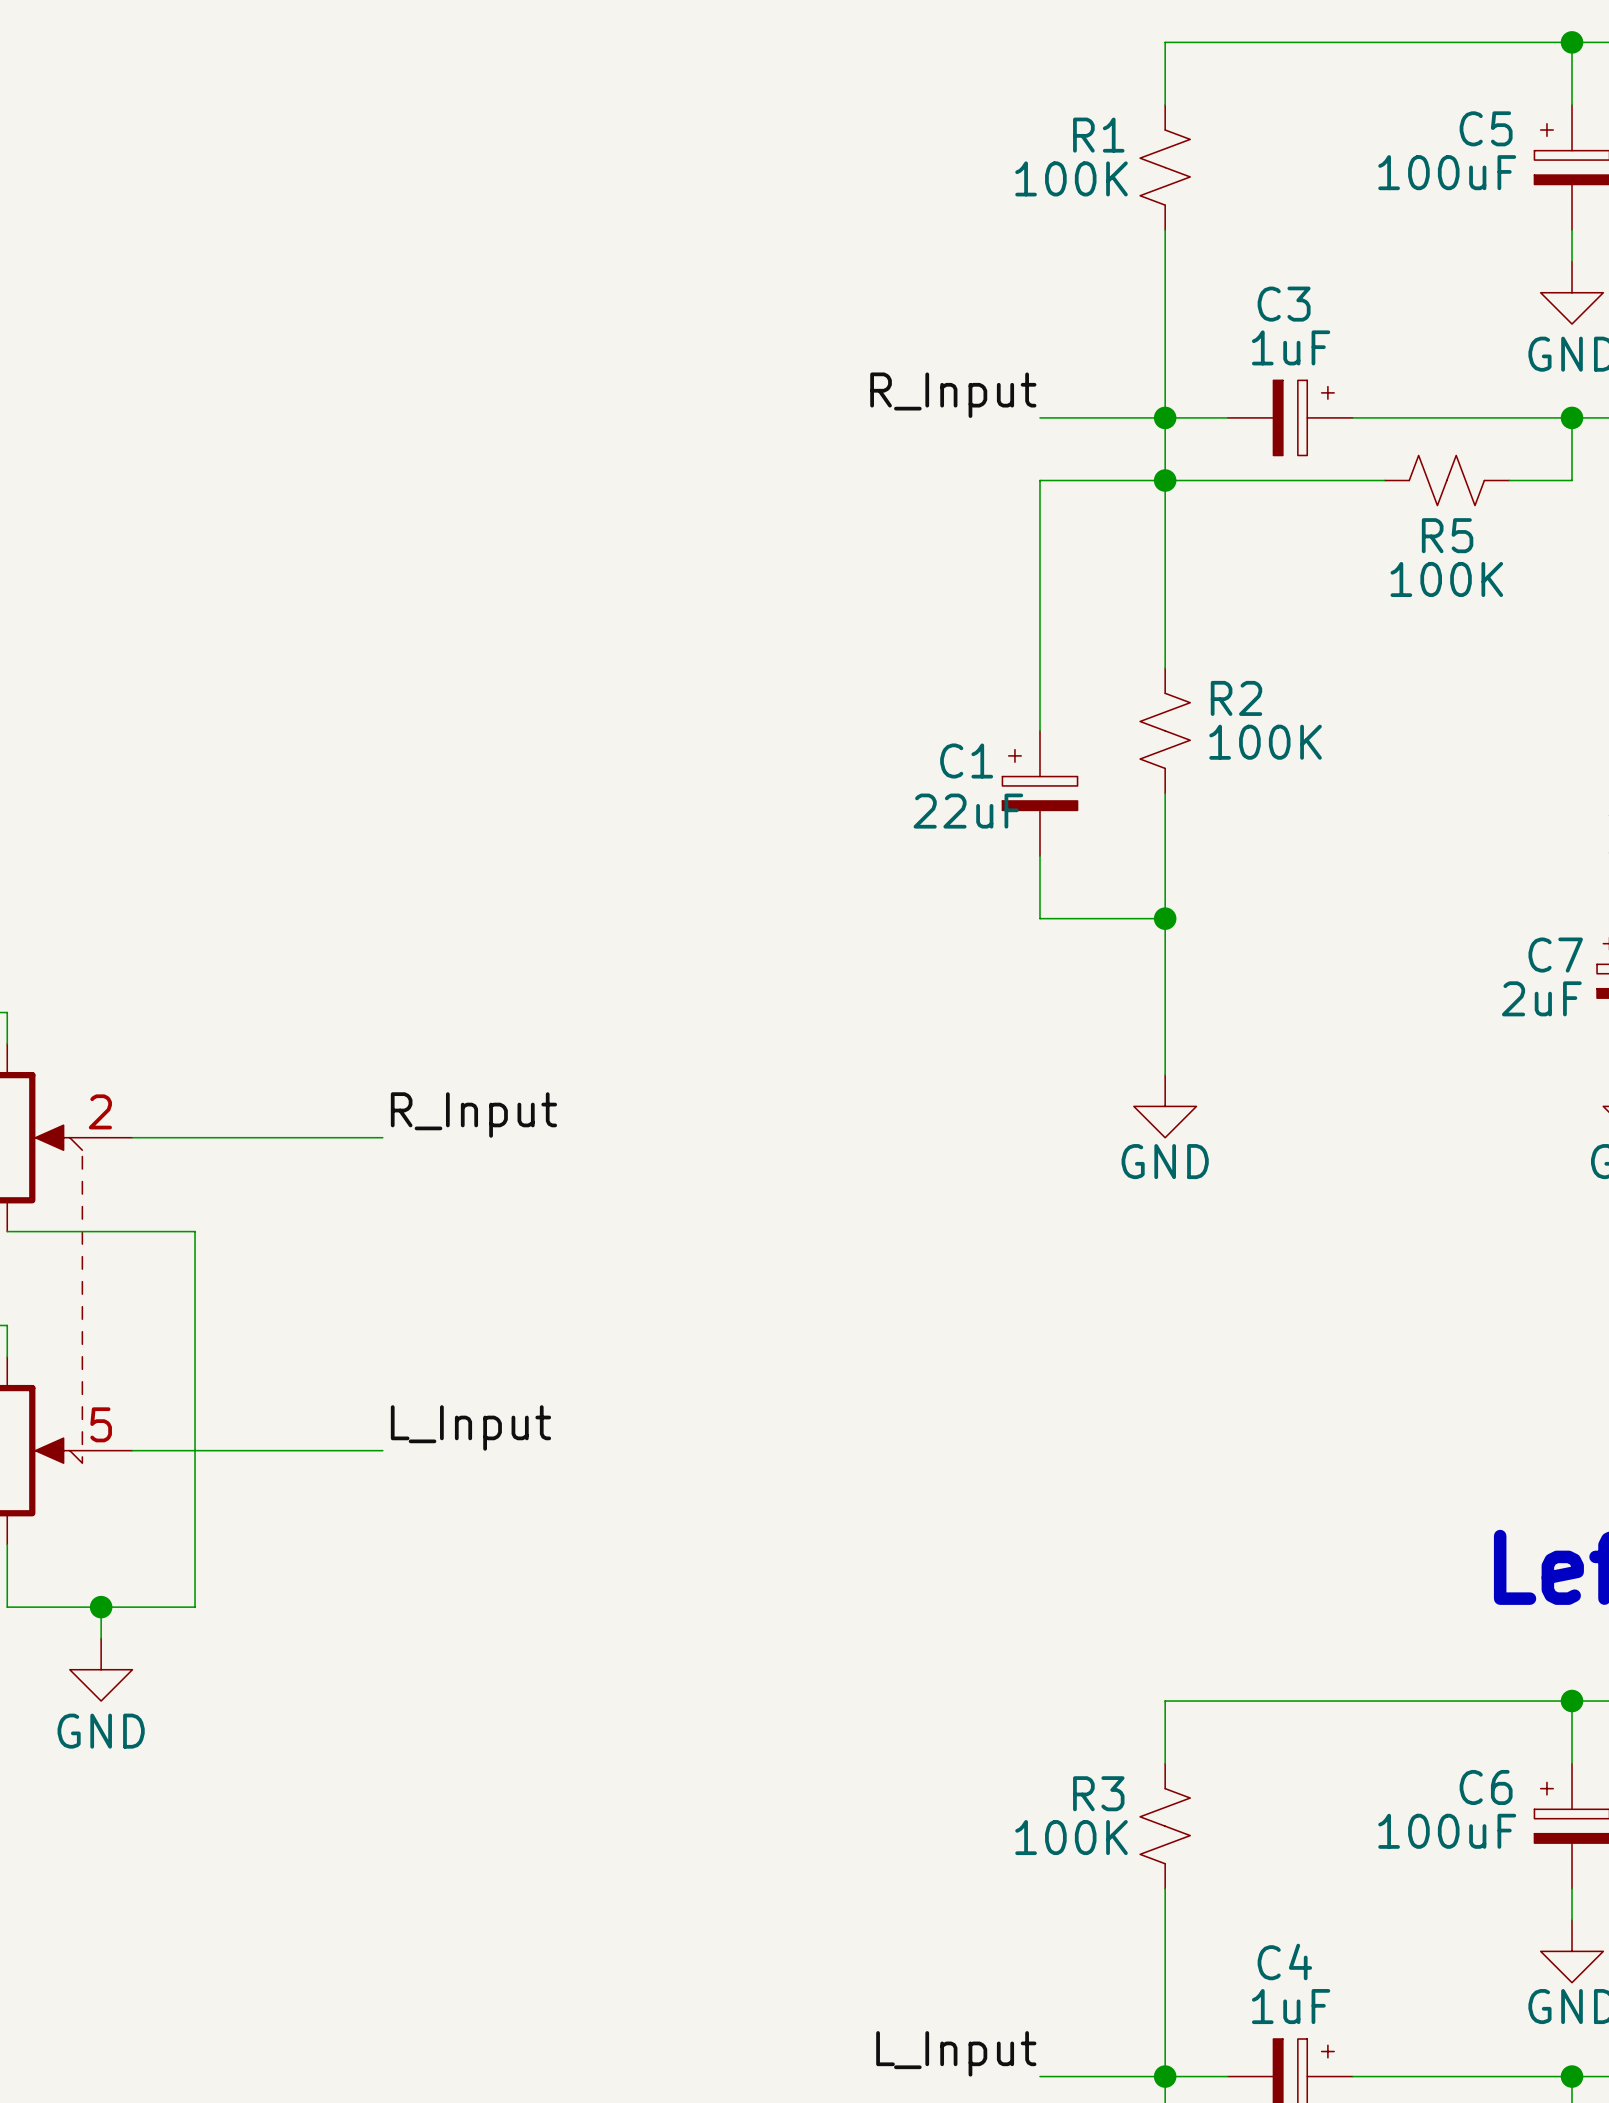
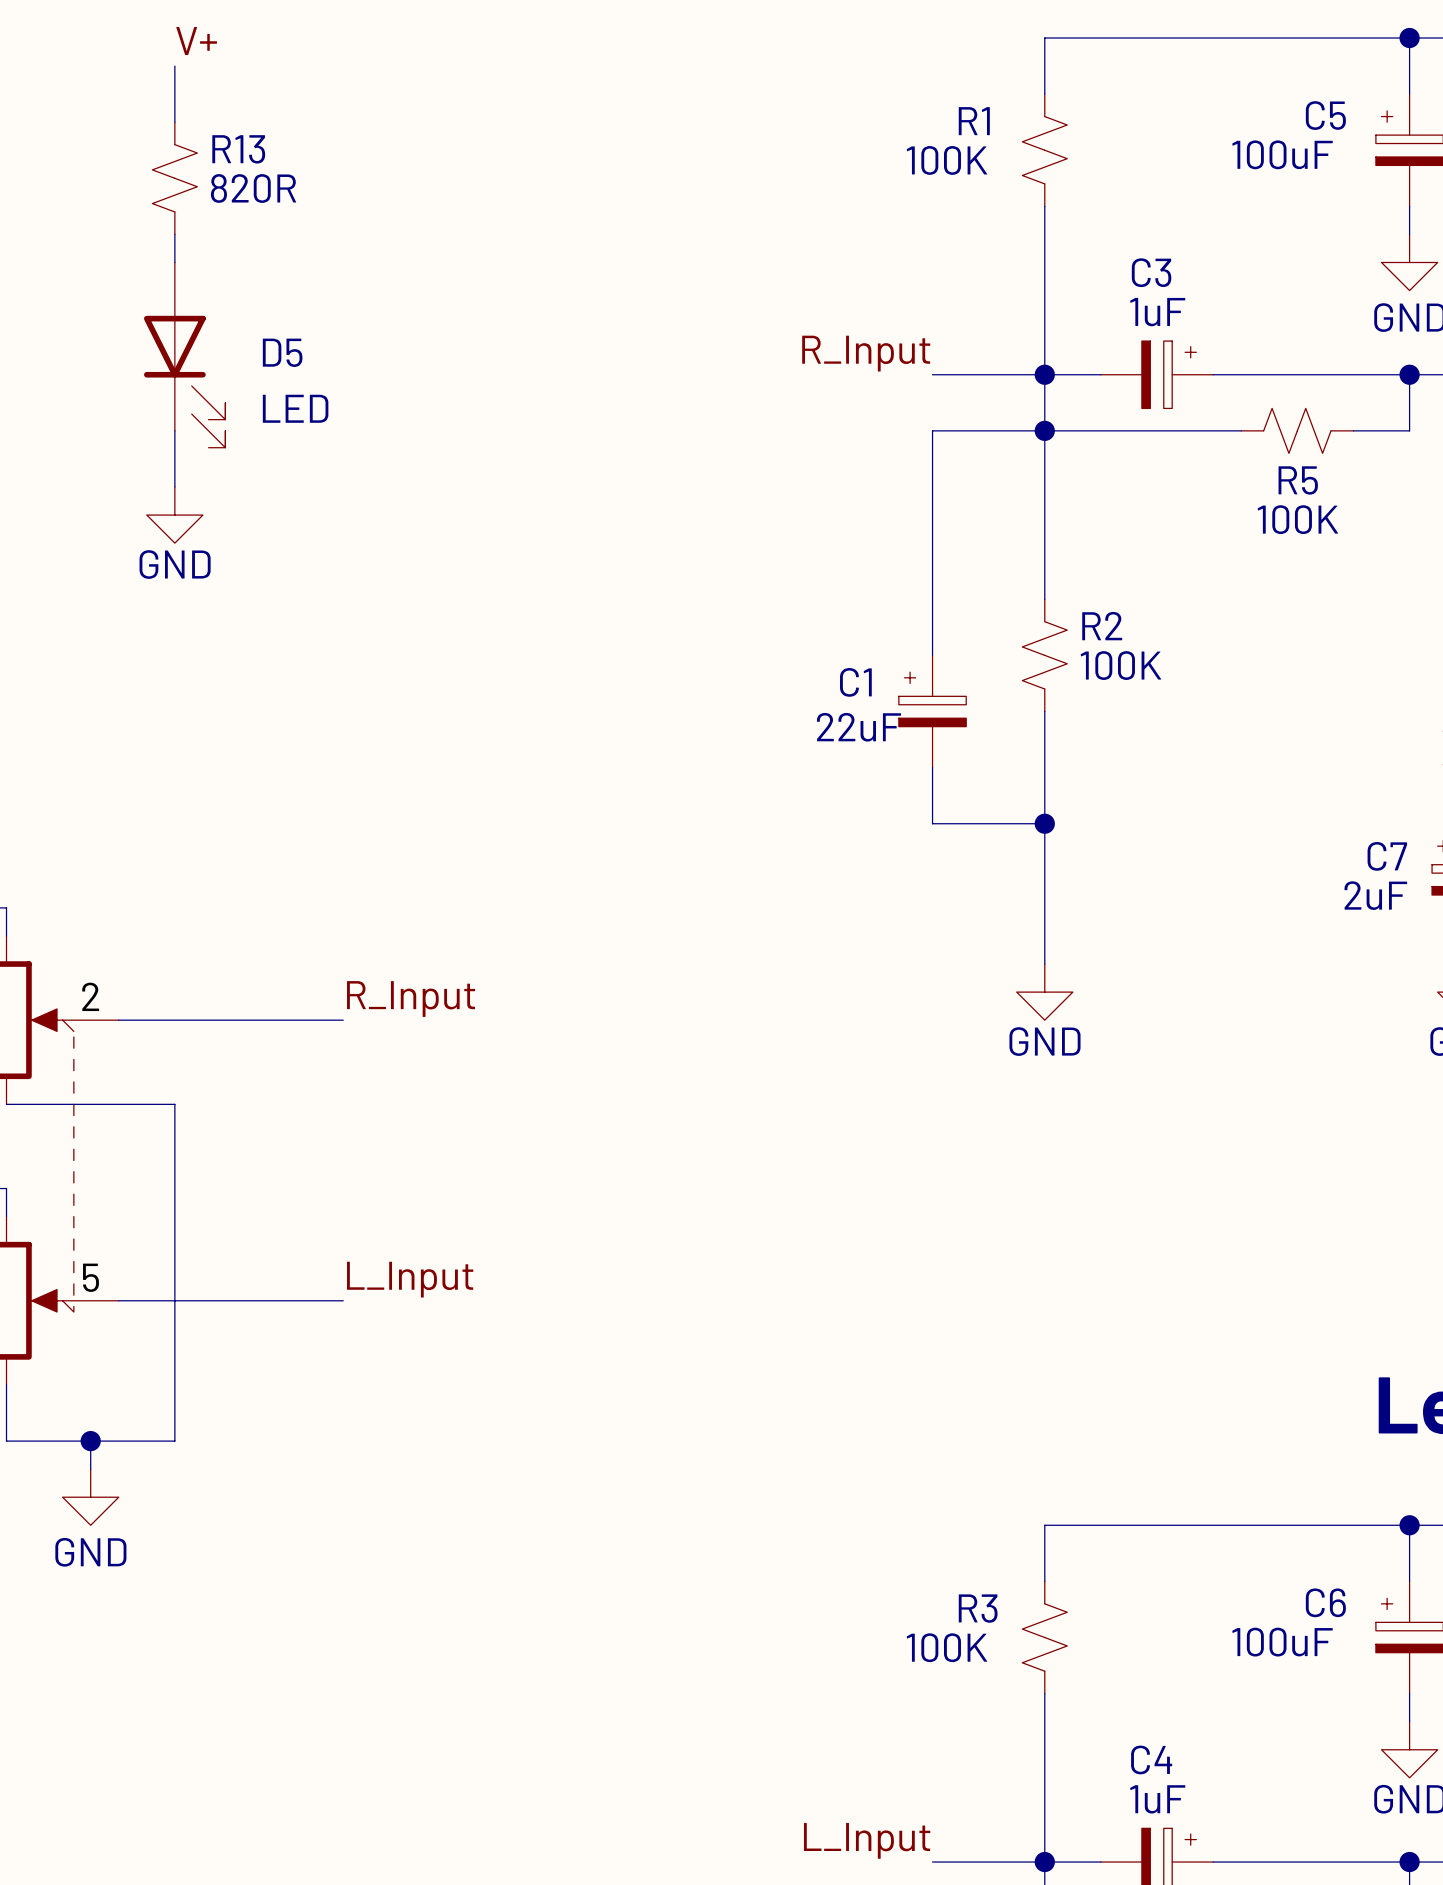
label: none -> V+ (196, 41)
wire: none -> (174, 66) (174, 122)
R13: none -> 820R (174, 178)
wire: none -> (174, 234) (174, 262)
D5: none -> LED (184, 355)
wire: none -> (174, 430) (174, 486)
power symbol: none -> GND (174, 515)

